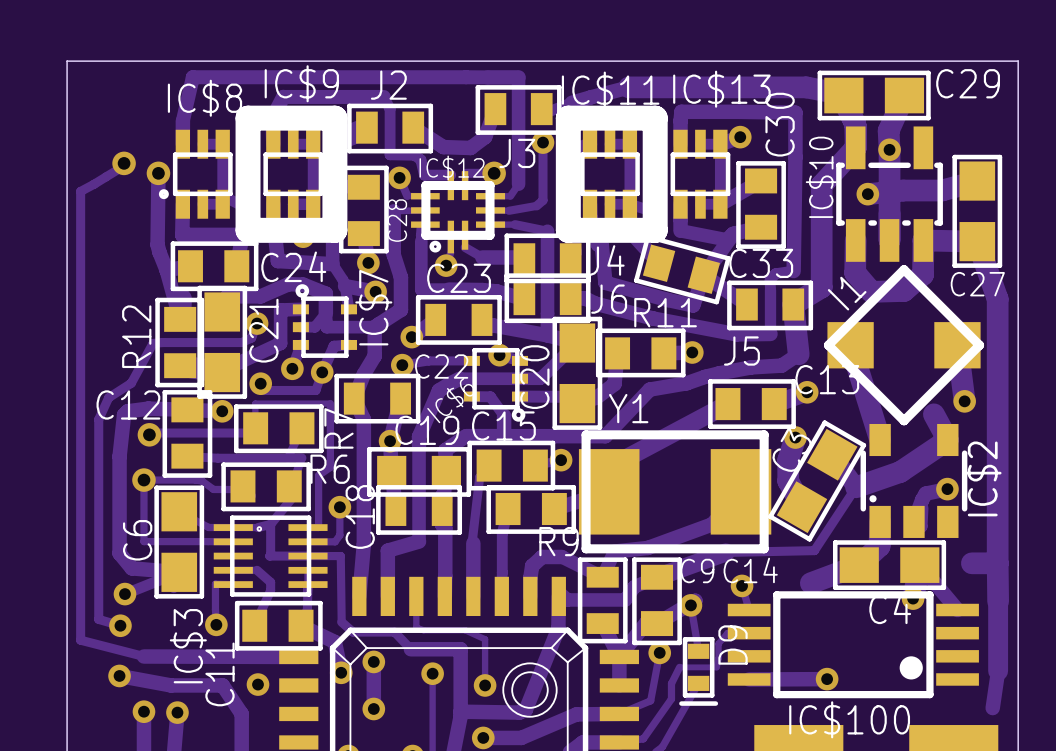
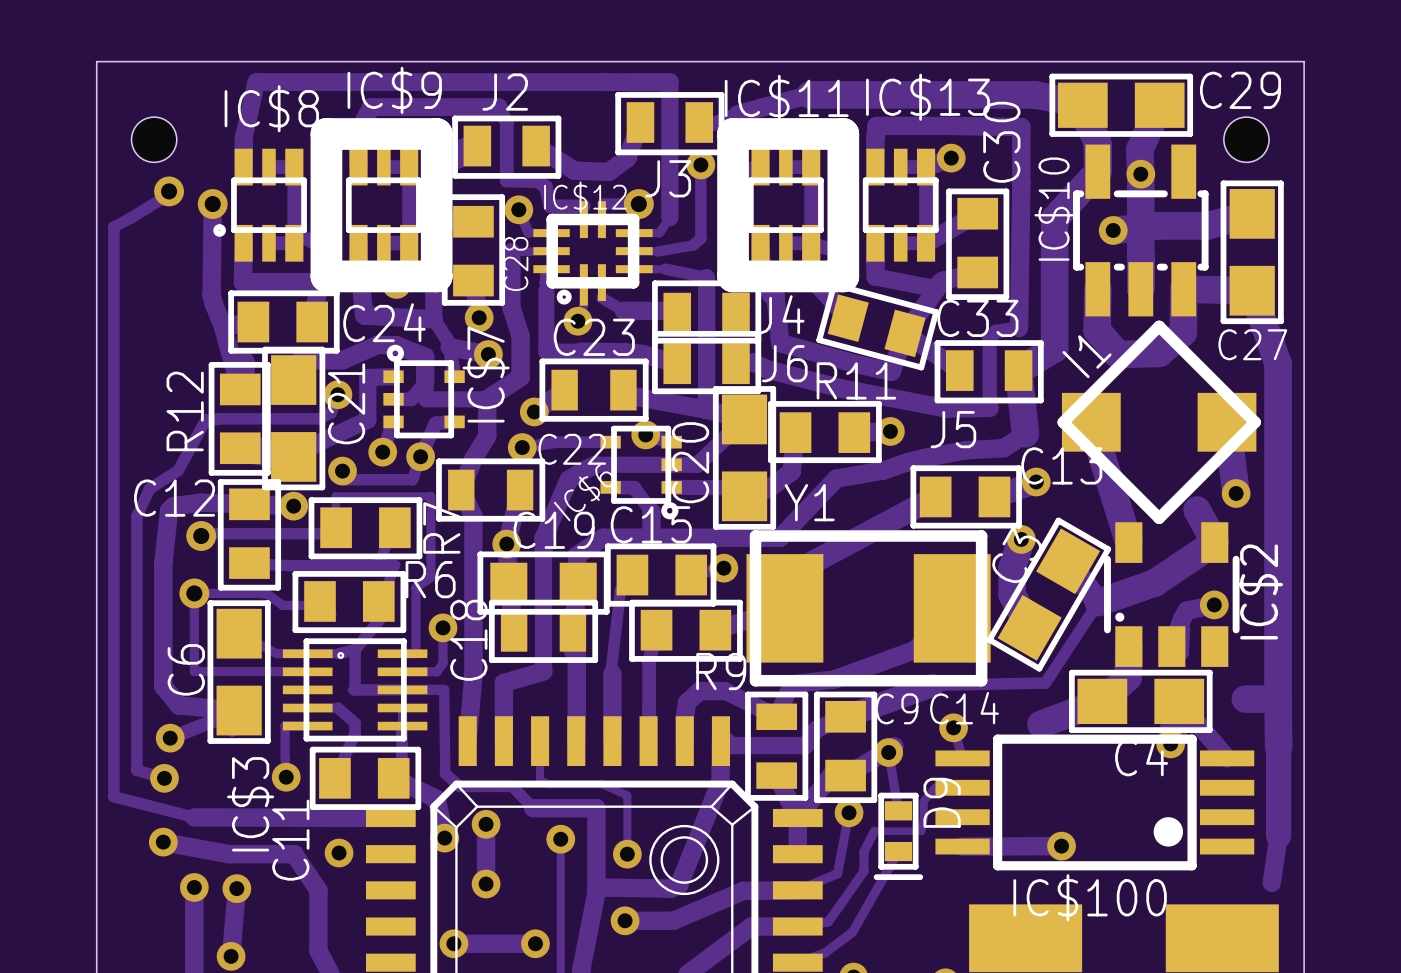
hole: none -> (154, 139)
hole: none -> (1246, 139)

